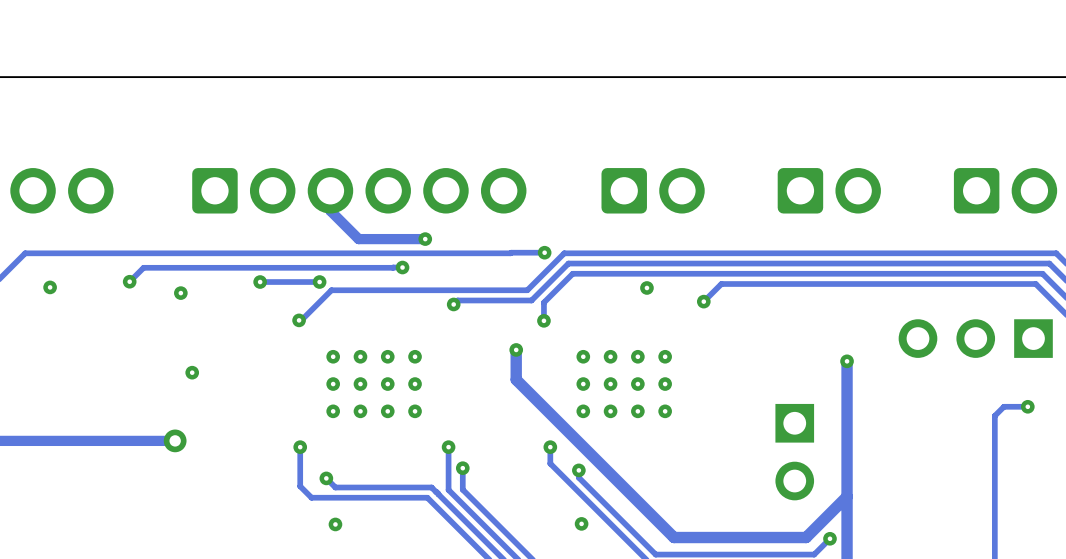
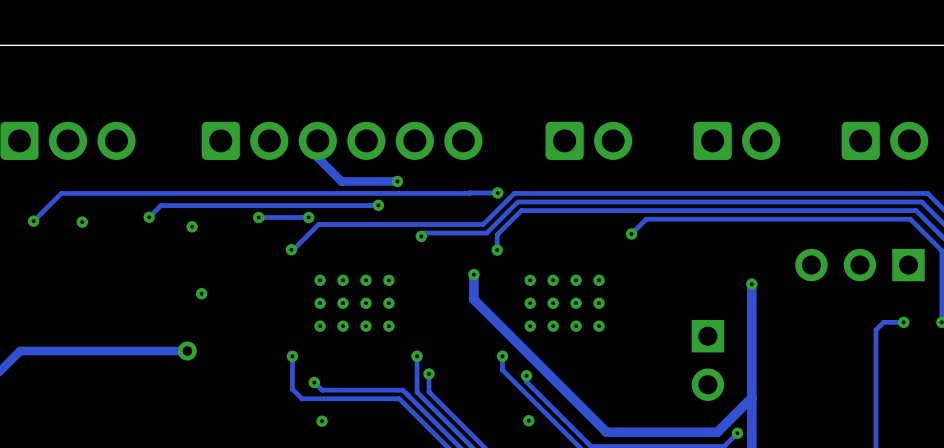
via: (646, 287) -> none

